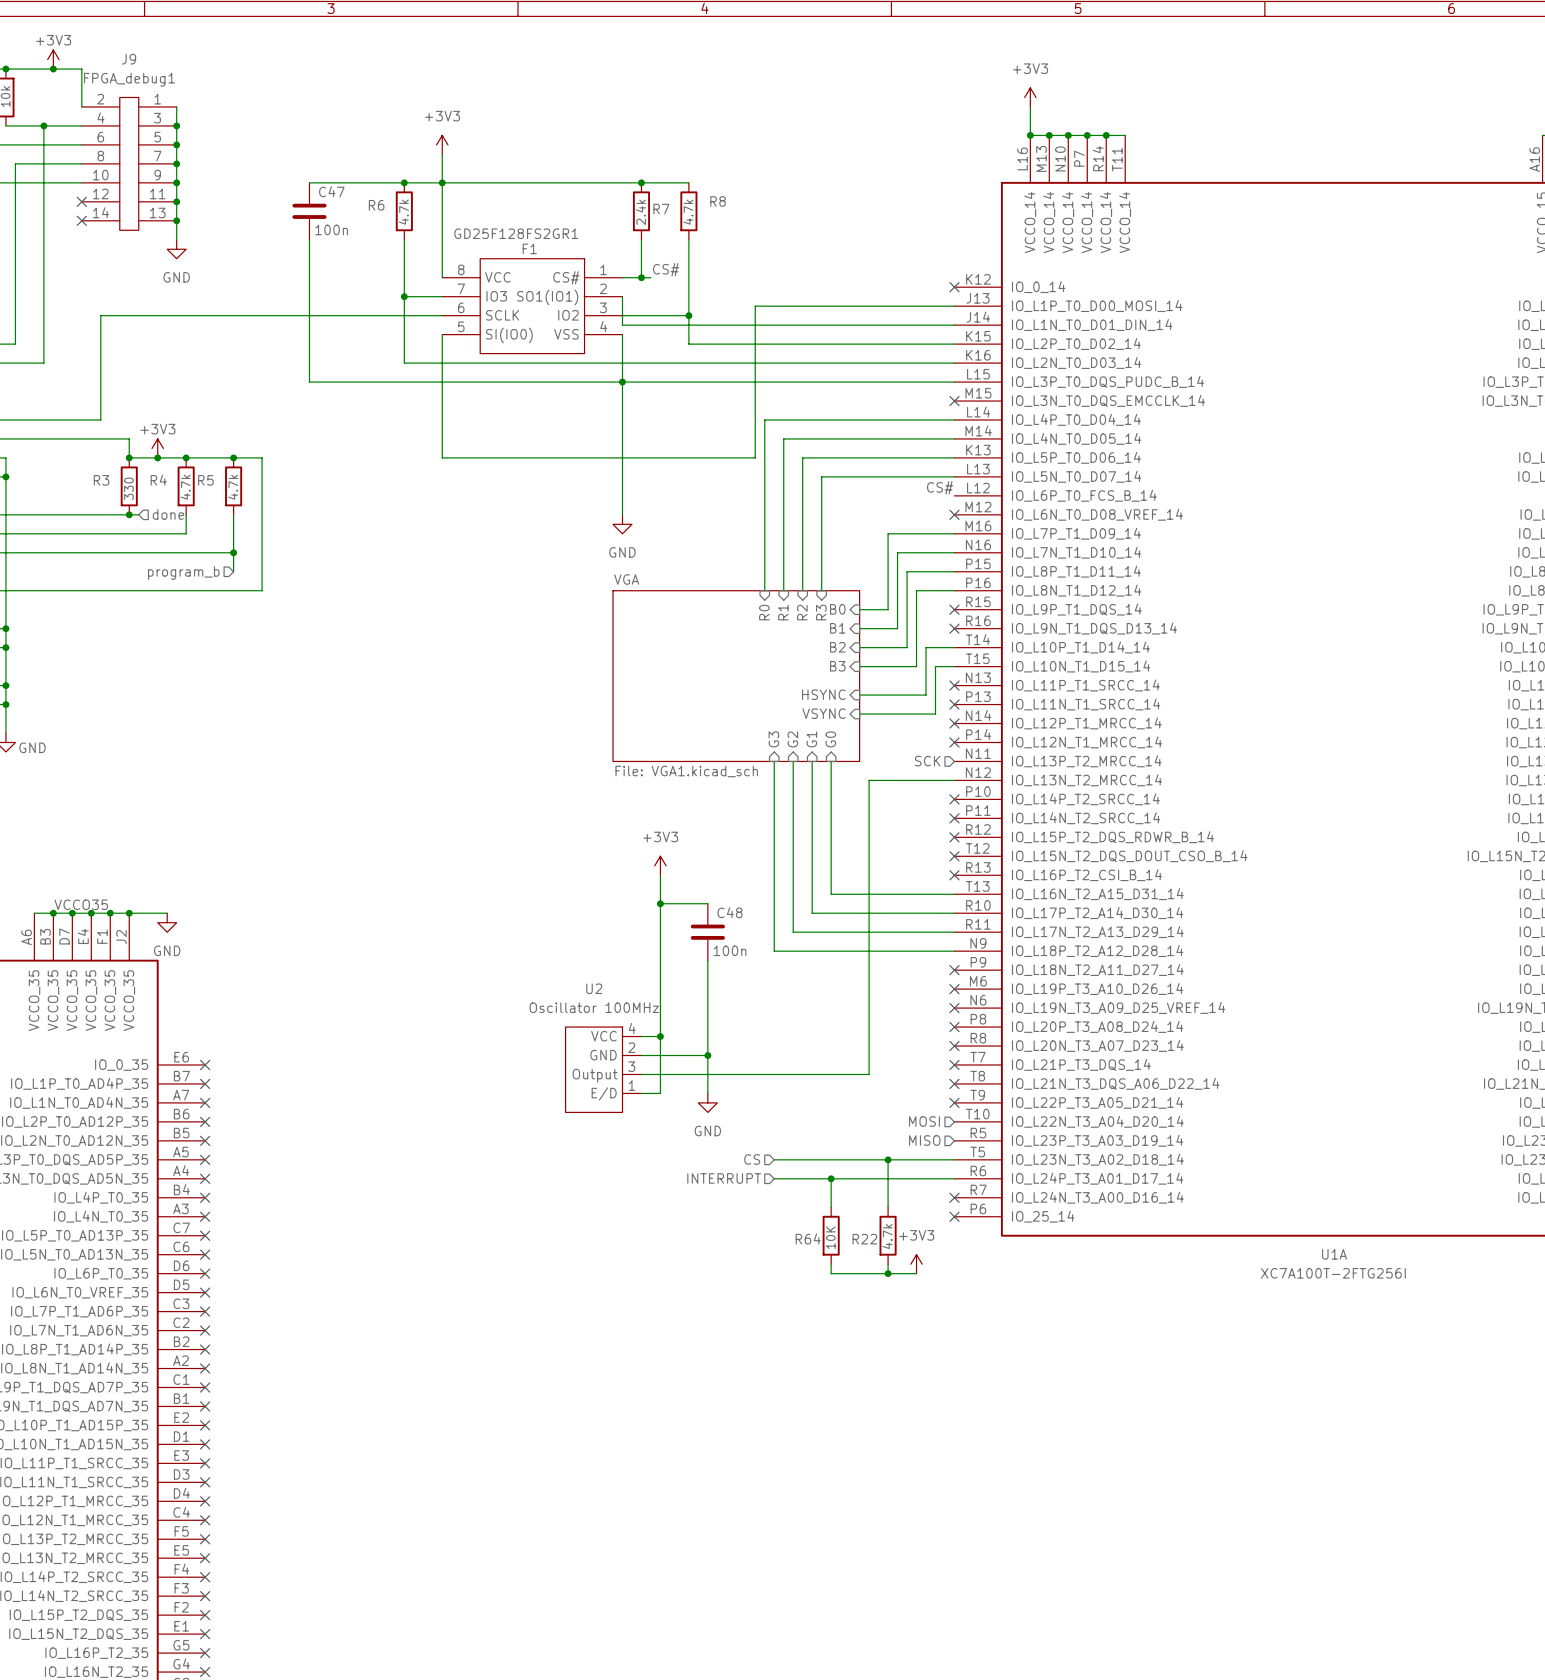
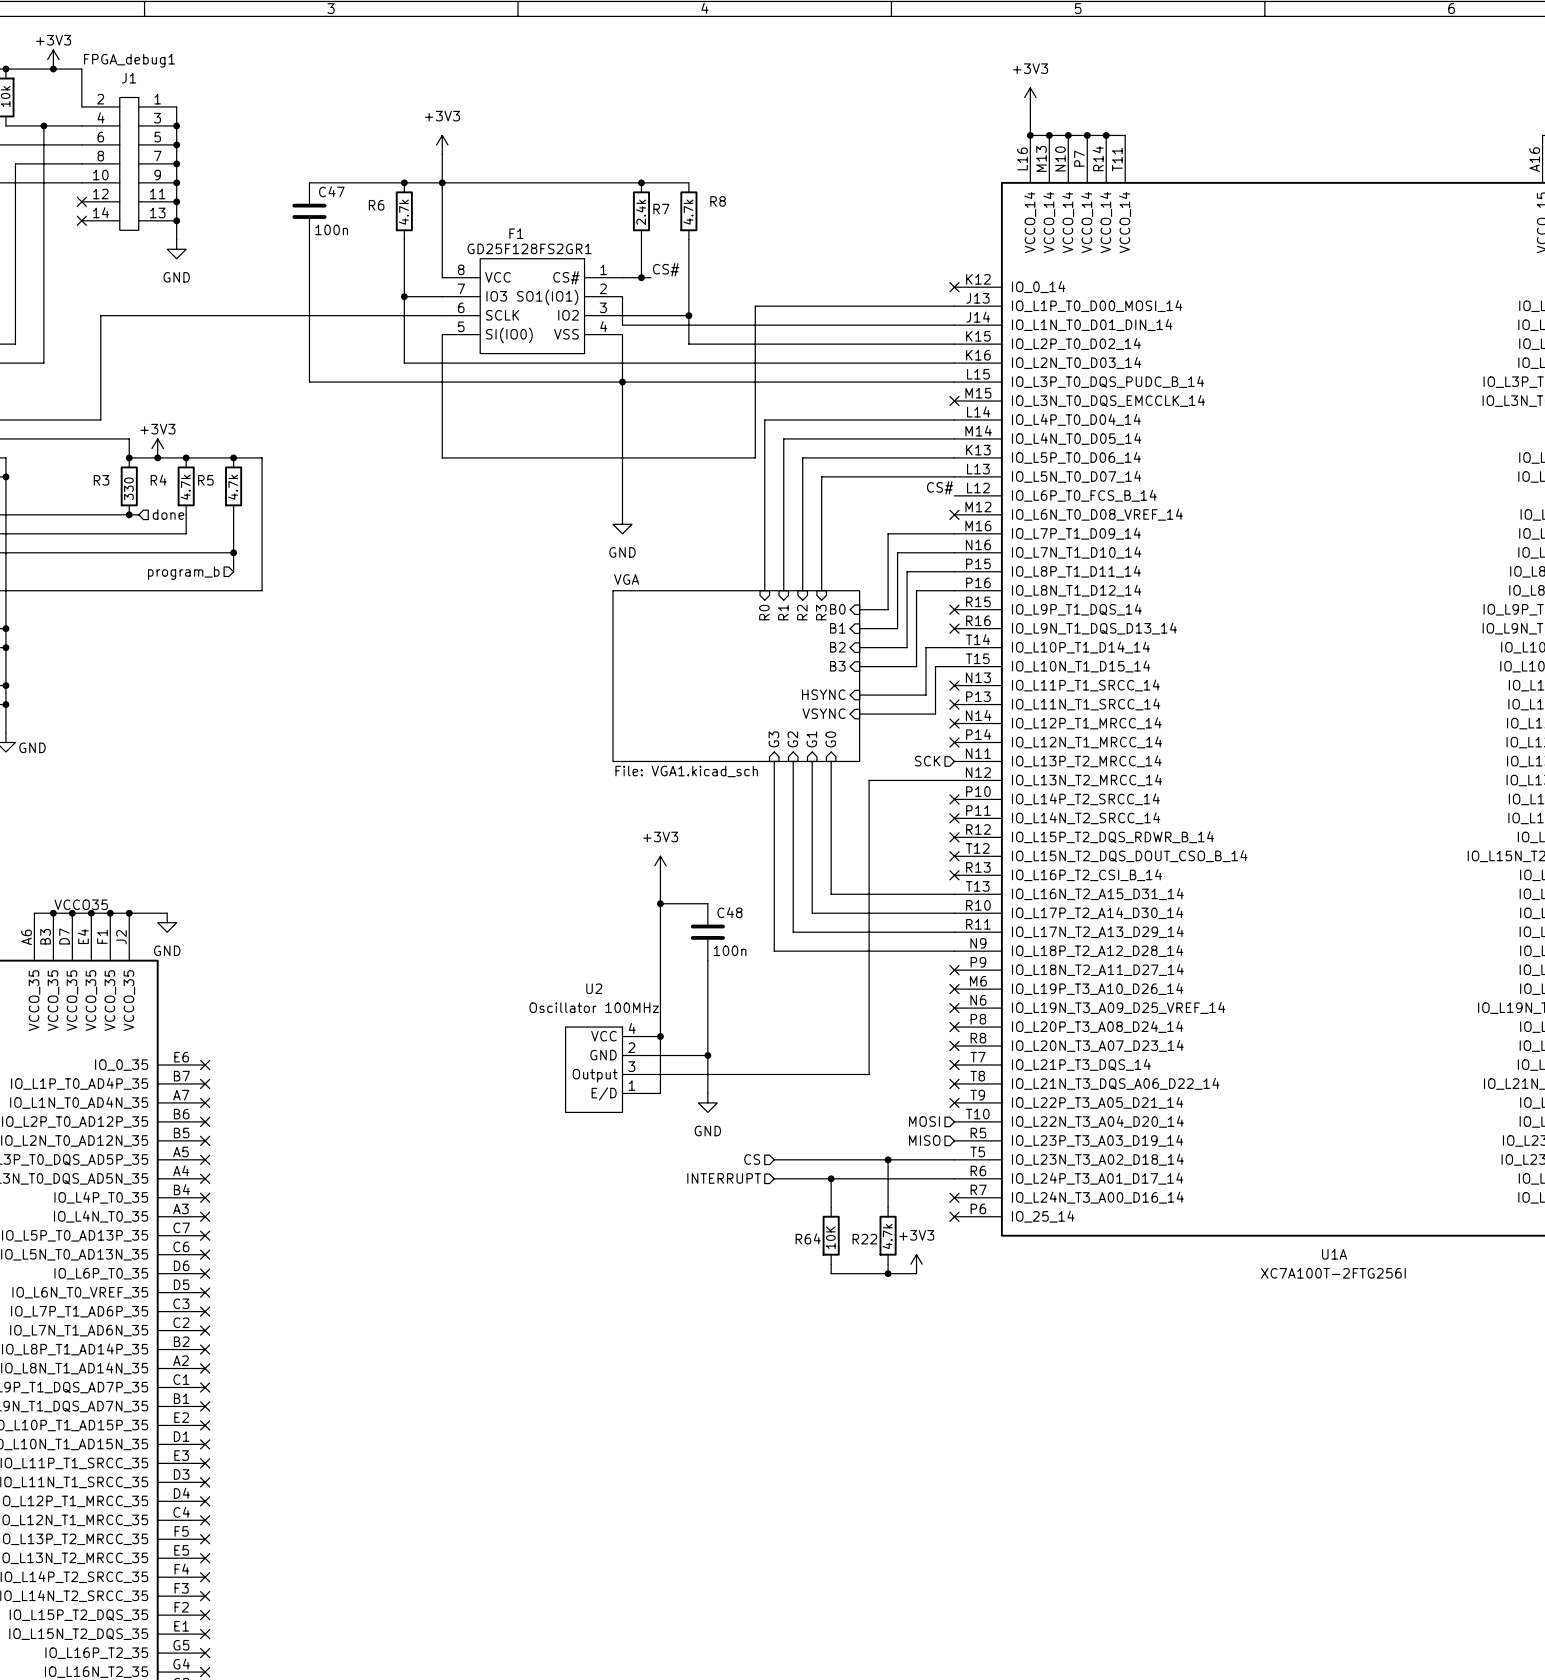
J9 name: J9 (129, 59) -> FPGA_debug1 (129, 60)
J9 value: FPGA_debug1 (129, 79) -> J1 (129, 78)
F1 value: GD25F128FS2GR1 (516, 233) -> F1 (516, 233)
F1 name: F1 (529, 248) -> GD25F128FS2GR1 (529, 248)

